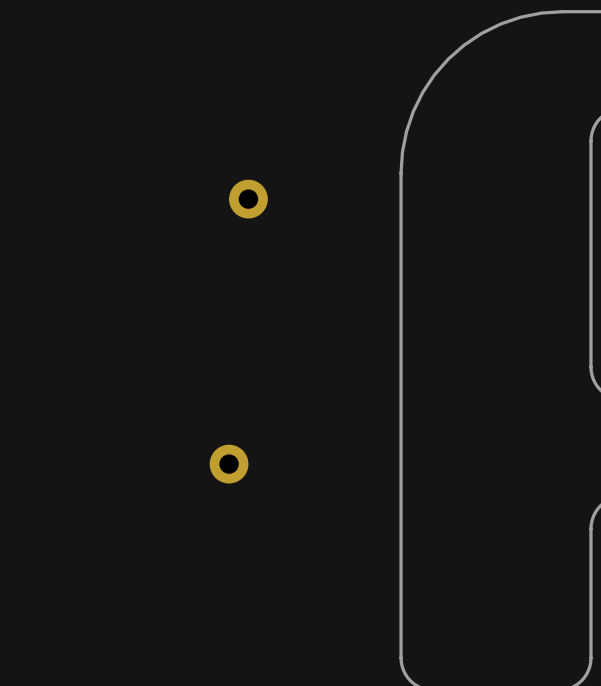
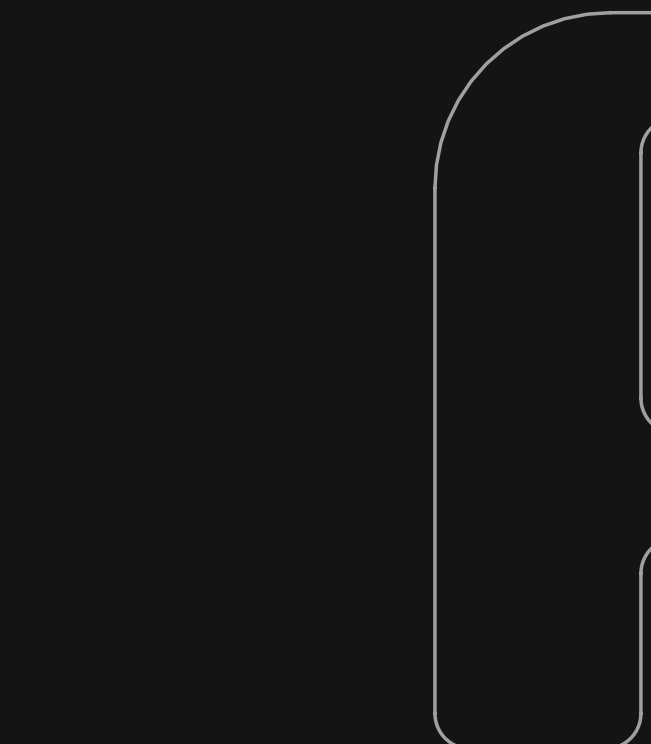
via: (248, 199) -> none
via: (229, 464) -> none

